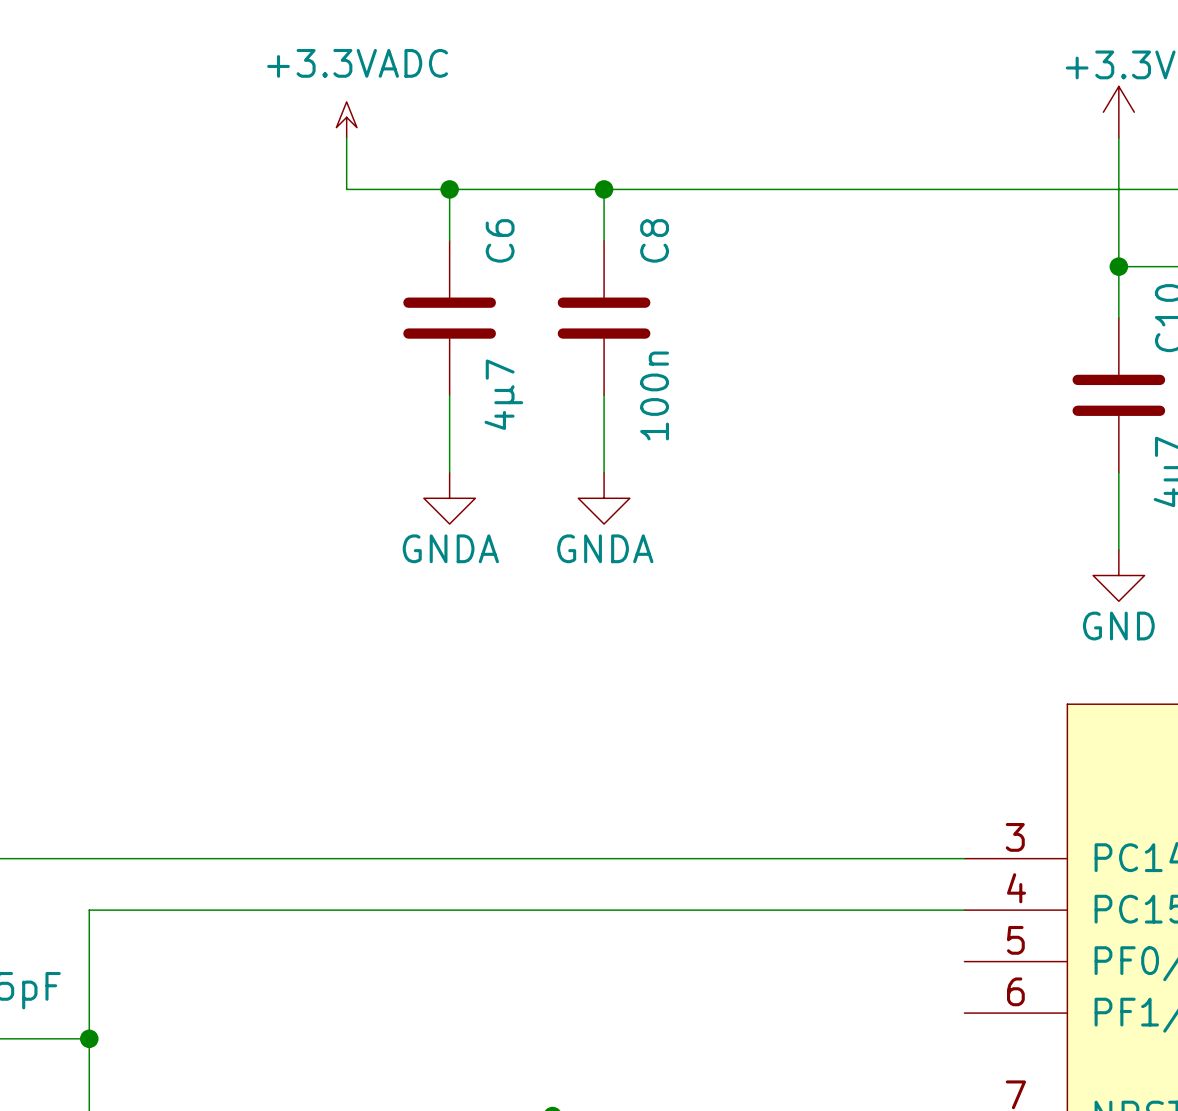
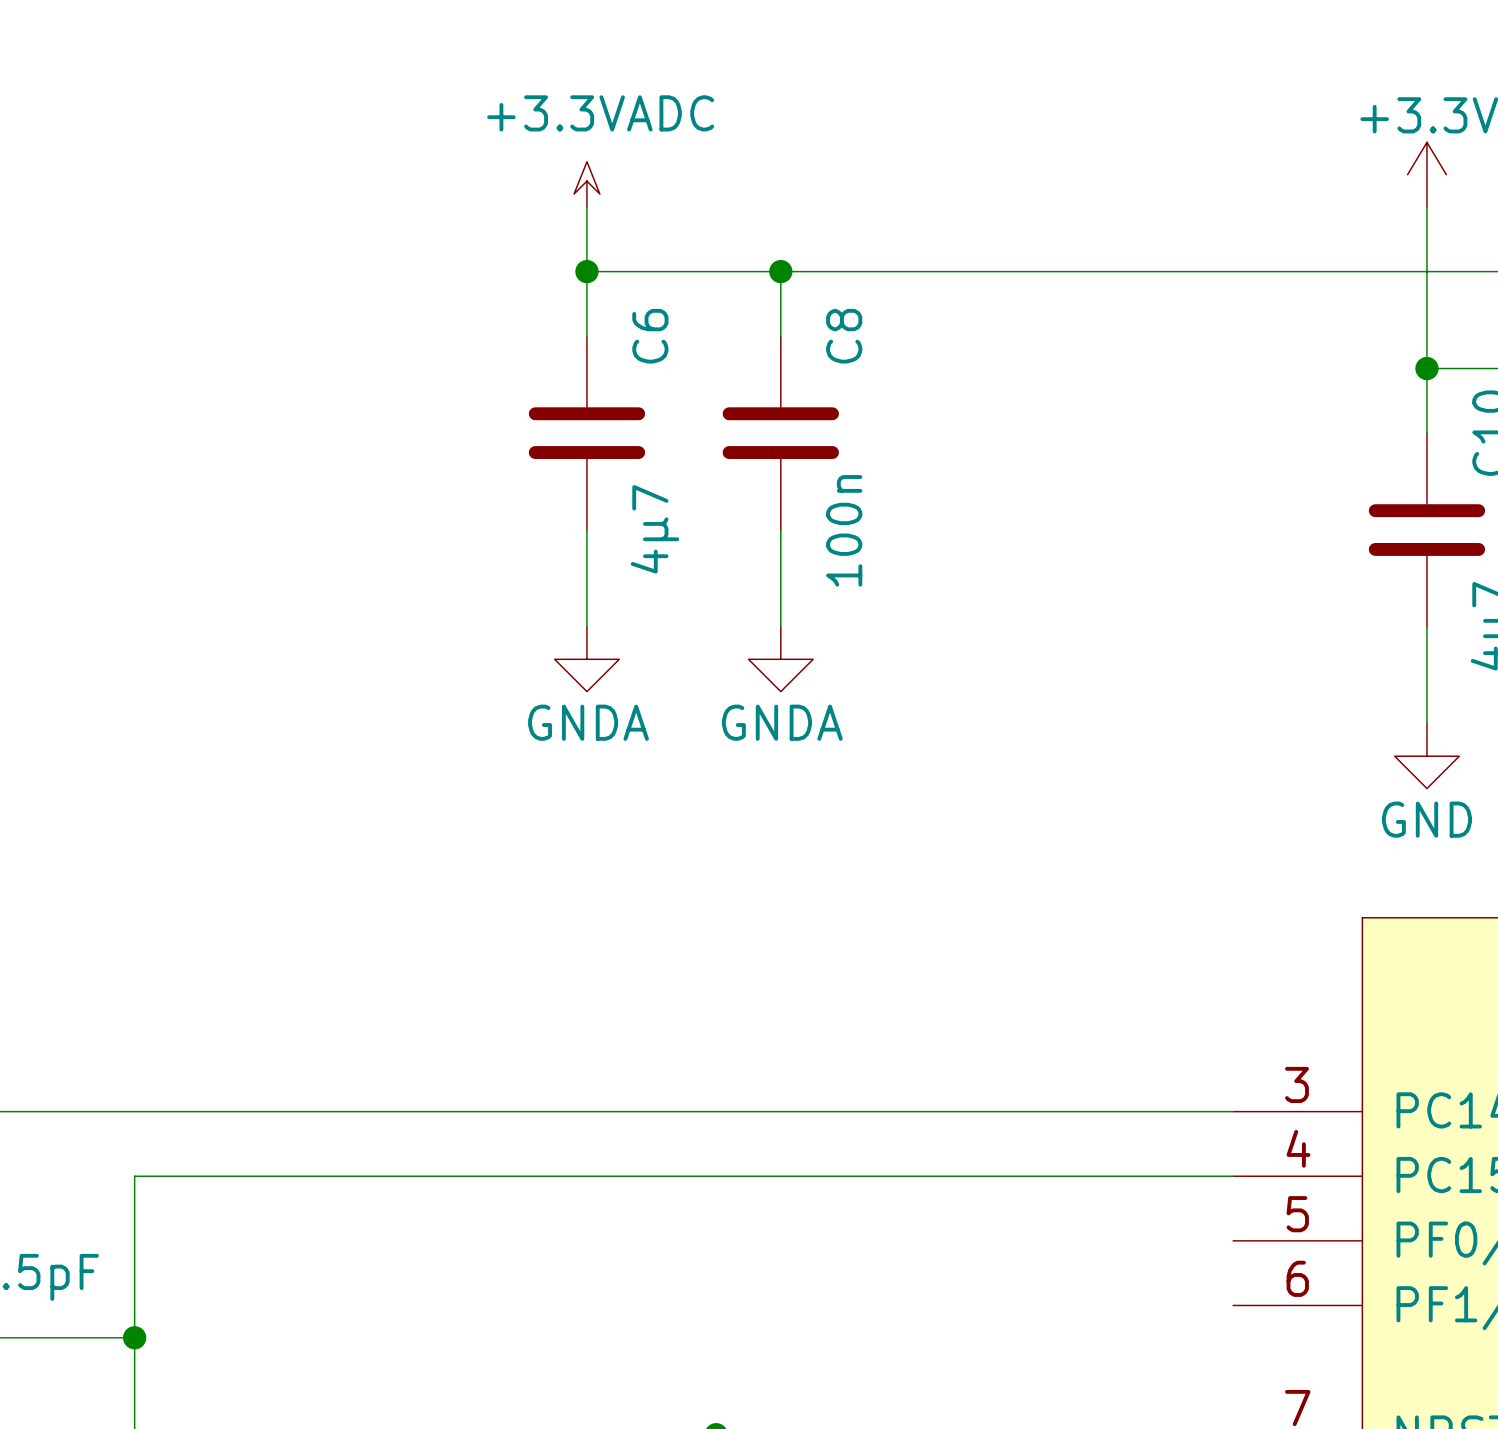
power symbol position: +3.3VADC (346, 119) -> +3.3VADC (586, 184)
wire: (346, 137) (346, 189) (449, 189) -> (586, 206) (586, 271)

